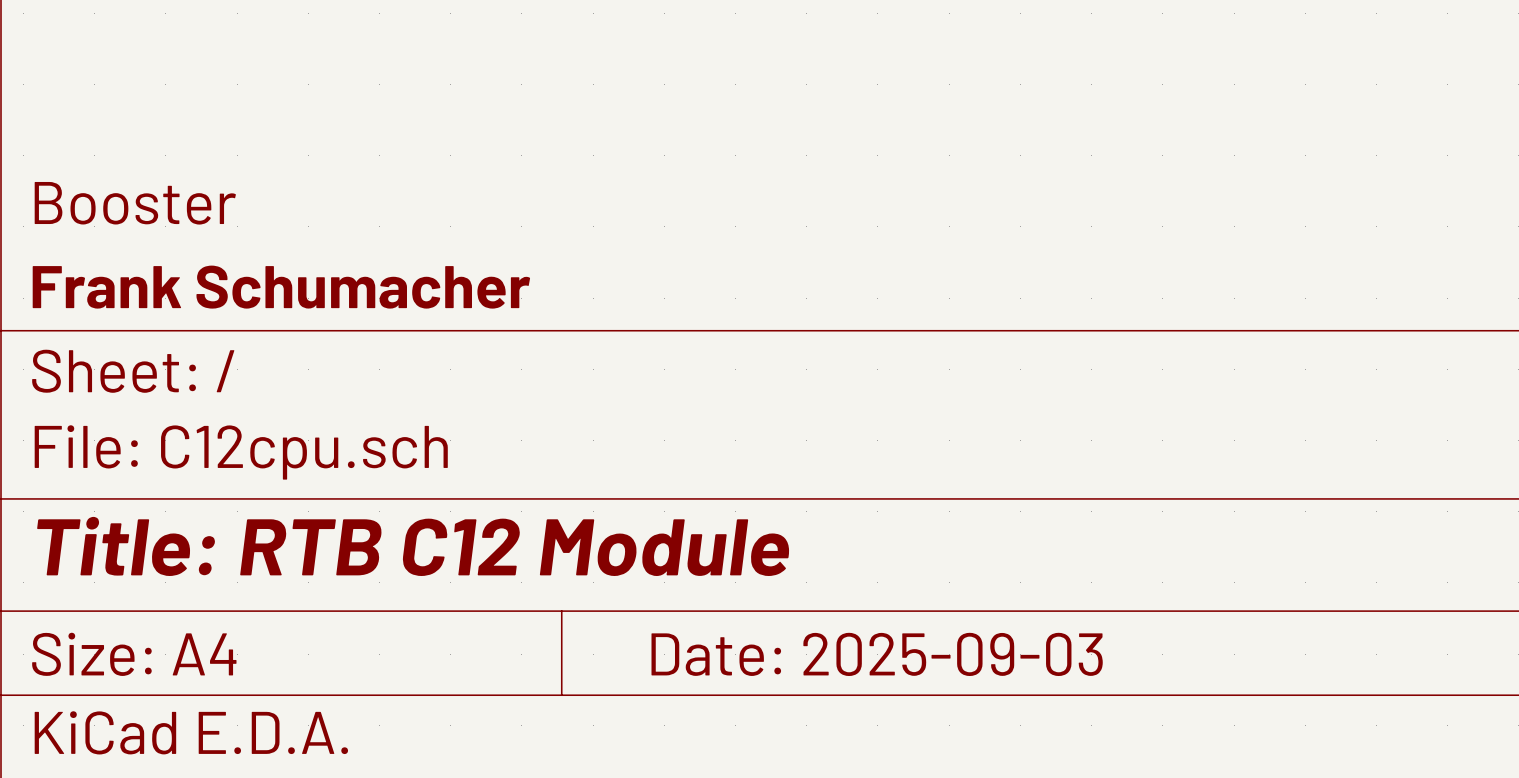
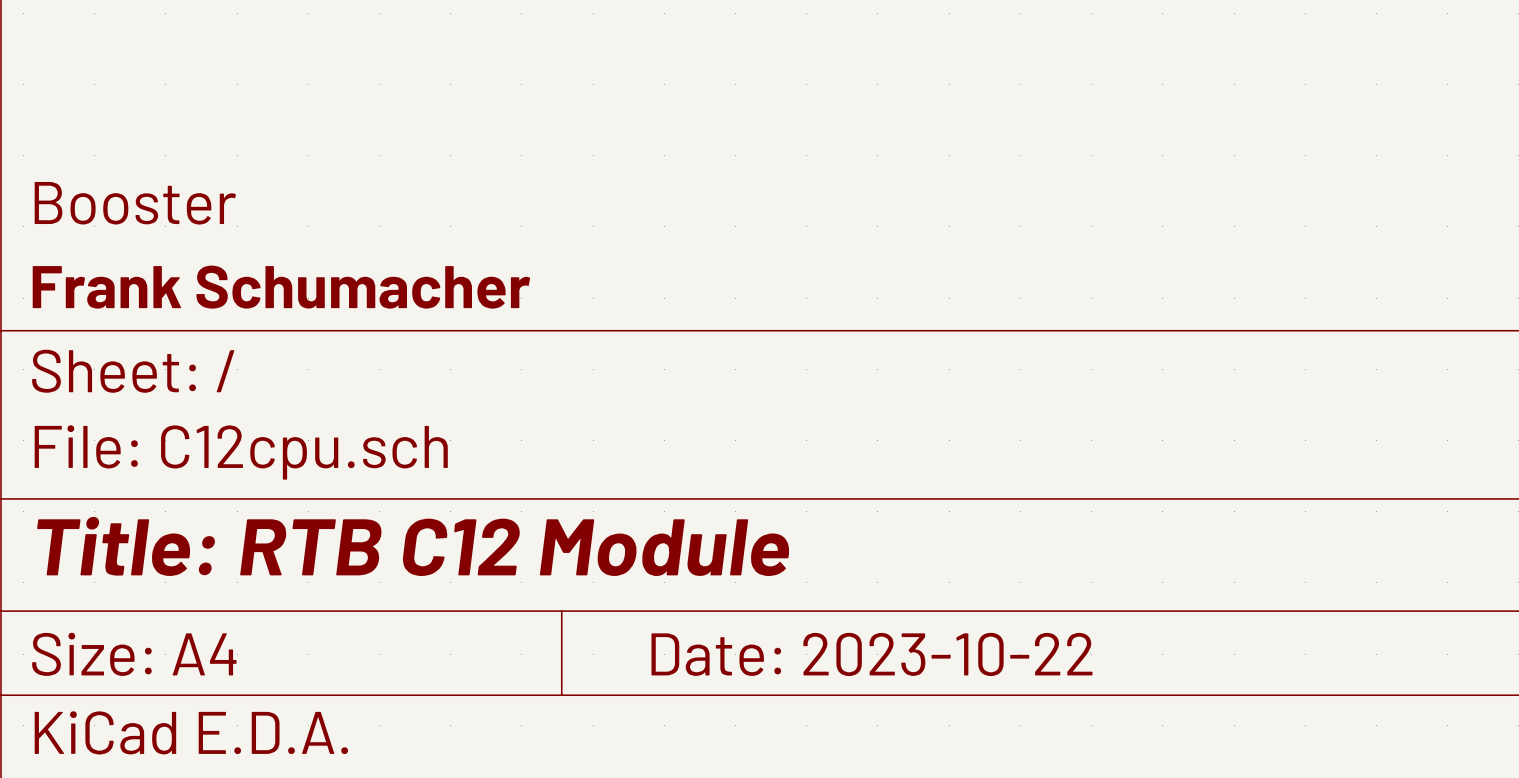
title block: Date: 2025-09-03 (877, 654) -> Date: 2023-10-22 (871, 654)

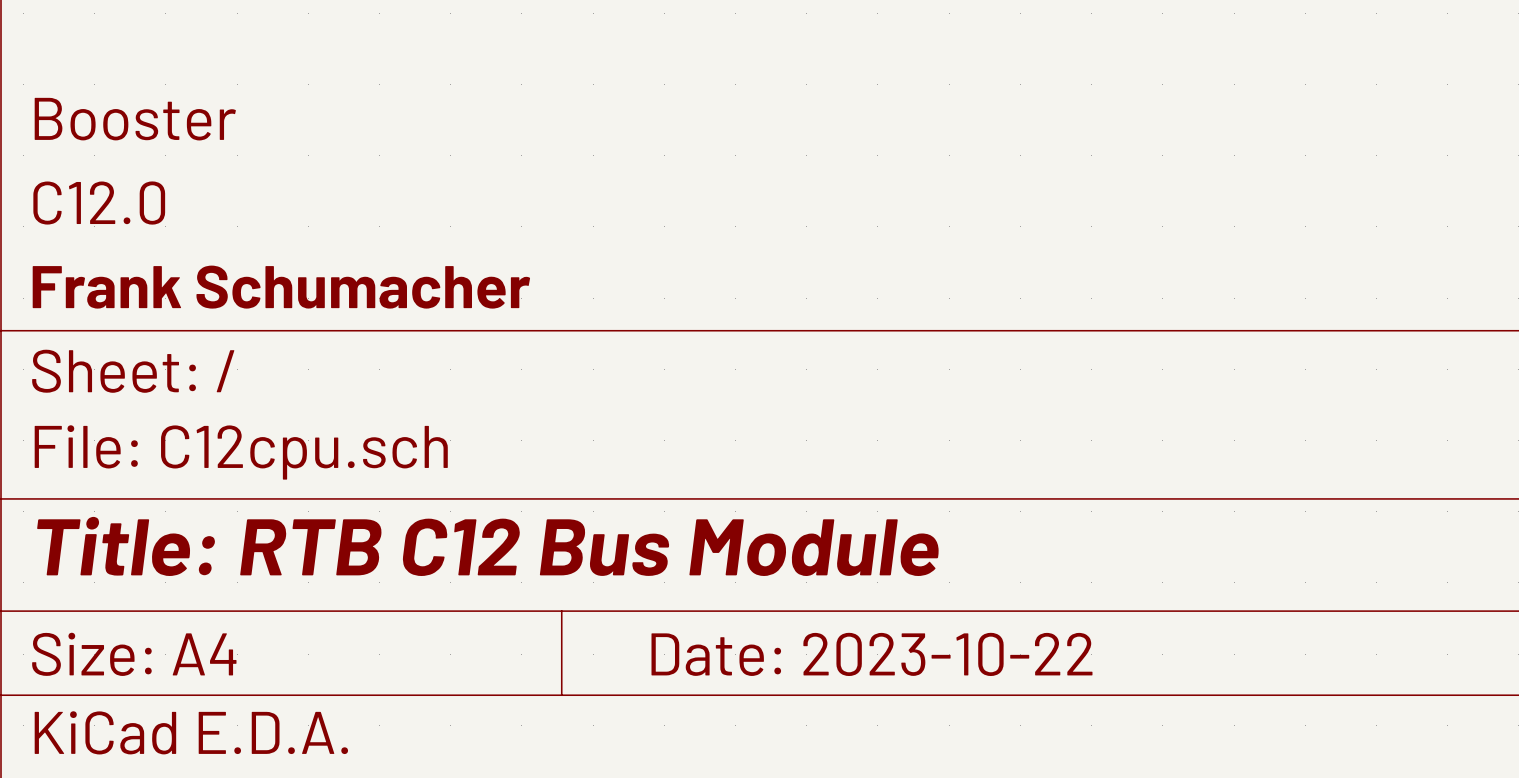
title block: none -> Booster (135, 119)
title block: Booster (135, 203) -> C12.0 (99, 203)
title block: Title: RTB C12 Module (413, 546) -> Title: RTB C12 Bus Module (487, 546)

